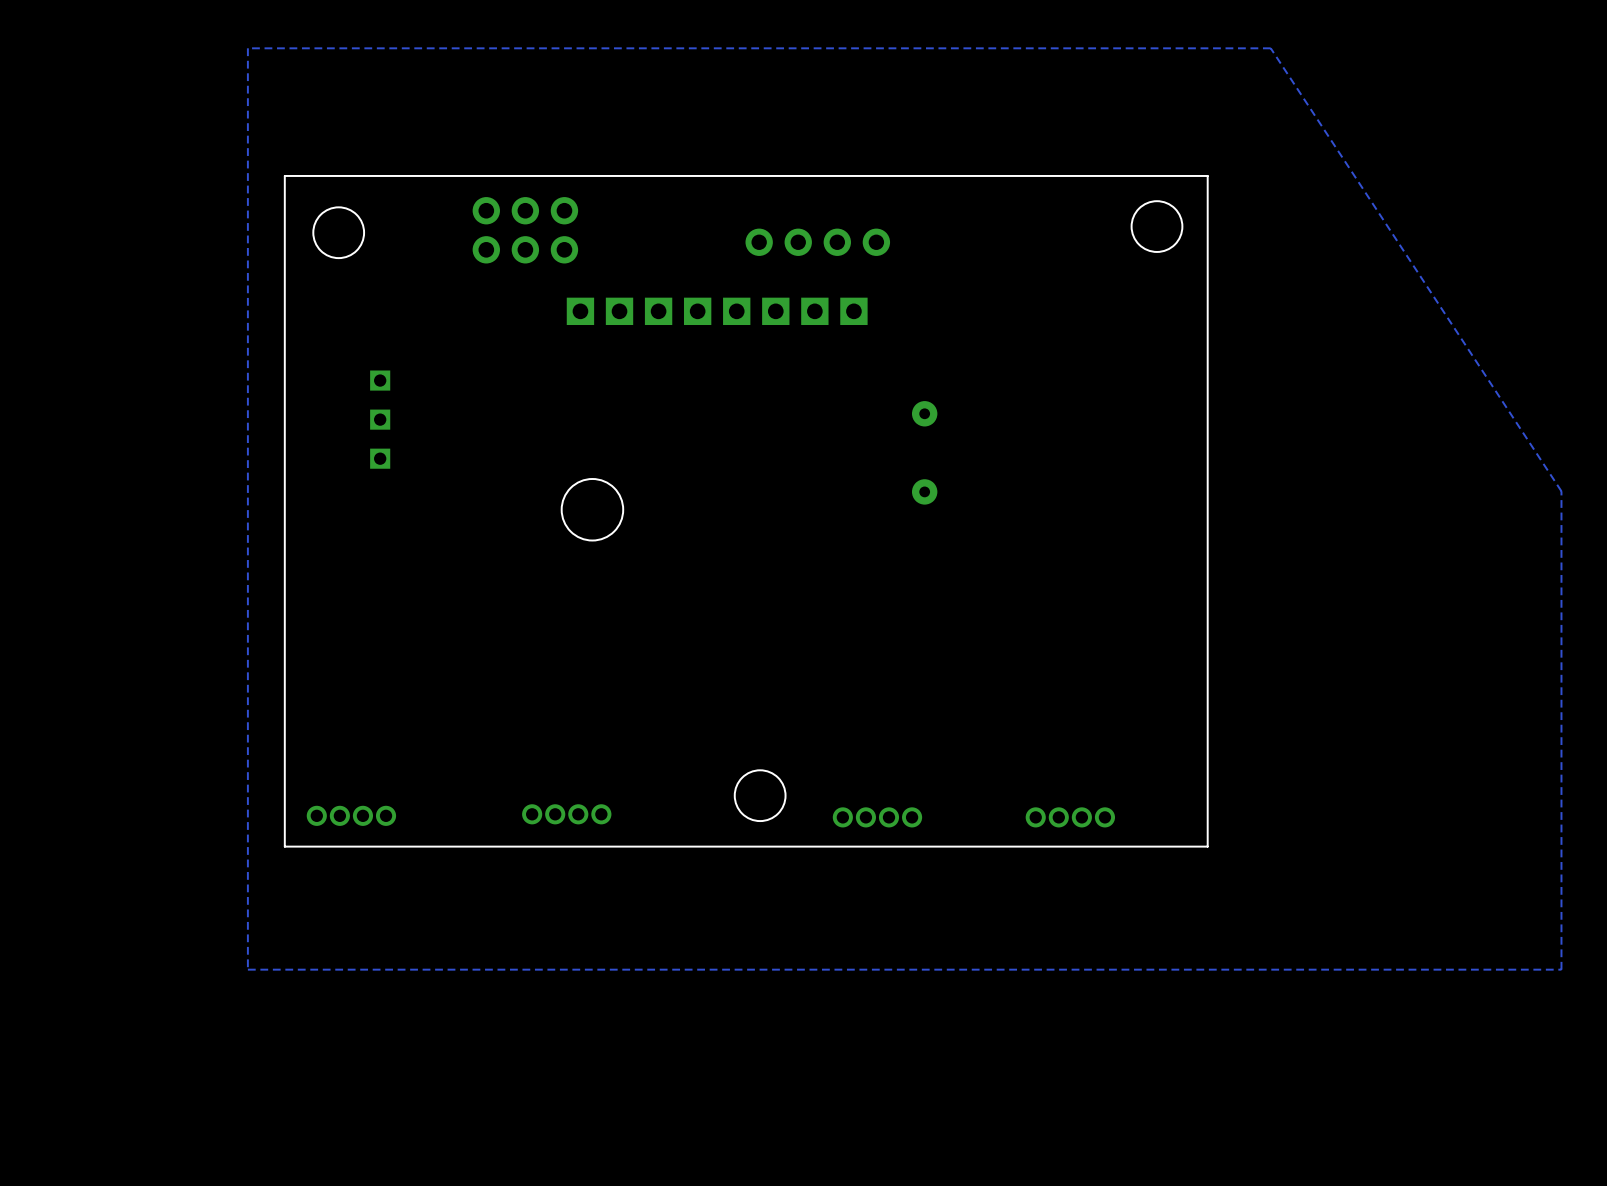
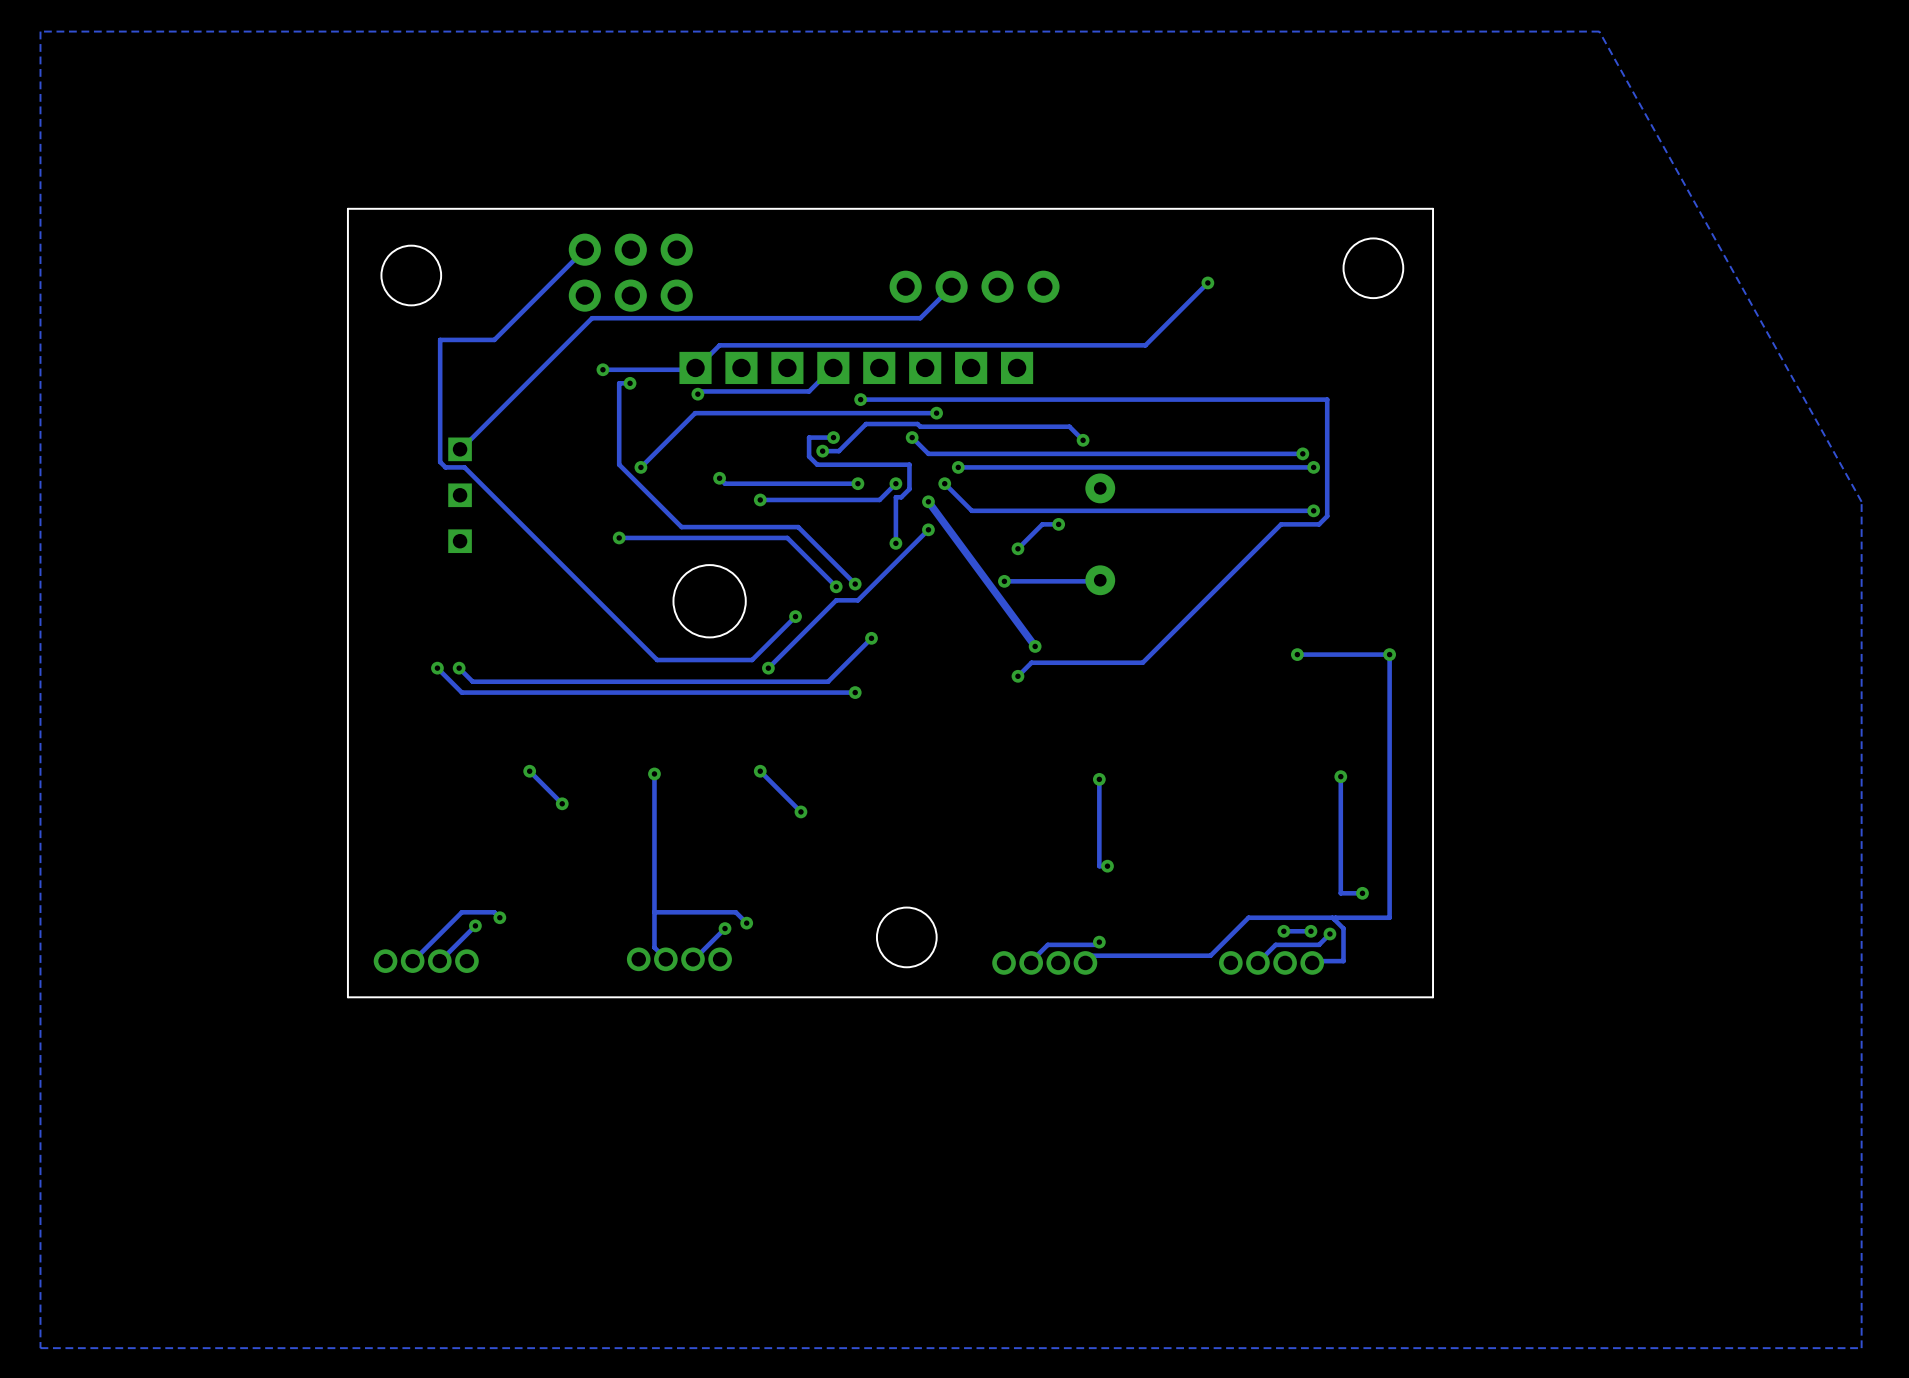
zone outline: (1270, 48) (247, 48) (247, 969) (1561, 969) (1561, 491) (1270, 48) -> (1599, 31) (1861, 501) (1861, 1348) (40, 1348) (40, 31) (1599, 31)
track: none -> (584, 249) (494, 339) (440, 339) (440, 461) (445, 467) (464, 467) (657, 660) (752, 660) (795, 616)
track: none -> (1207, 282) (1145, 345) (719, 345) (695, 369) (602, 369)
via: none -> (1207, 282)
track: none -> (951, 286) (920, 318) (592, 318) (460, 449)
track: none -> (833, 367) (809, 391) (700, 391) (697, 394)
via: none -> (602, 369)
track: none -> (630, 383) (619, 383) (619, 464) (681, 527) (798, 527) (855, 584)
via: none -> (630, 383)
via: none -> (697, 394)
track: none -> (860, 399) (1327, 399) (1327, 516) (1319, 524) (1281, 524) (1142, 662) (1031, 662) (1017, 676)
via: none -> (860, 399)
track: none -> (936, 413) (695, 413) (640, 467)
via: none -> (936, 413)
track: none -> (833, 437) (809, 437) (809, 456) (817, 464) (909, 464) (909, 489) (901, 497) (895, 497) (895, 543)
via: none -> (833, 437)
track: none -> (912, 437) (928, 453) (1302, 453)
via: none -> (912, 437)
track: none -> (1083, 440) (1069, 426) (920, 426) (917, 424) (866, 424) (838, 451) (822, 451)
via: none -> (1083, 440)
via: none -> (822, 451)
via: none -> (1302, 453)
via: none -> (640, 467)
via: none -> (958, 467)
track: none -> (1313, 467) (958, 467)
via: none -> (1313, 467)
track: none -> (719, 478) (725, 483) (857, 483)
via: none -> (719, 478)
via: none -> (857, 483)
track: none -> (895, 483) (879, 499) (760, 499)
via: none -> (895, 483)
track: none -> (944, 483) (971, 510) (1313, 510)
via: none -> (944, 483)
via: none -> (760, 499)
track: none -> (928, 501) (1035, 646)
via: none -> (928, 501)
via: none -> (1313, 510)
track: none -> (1058, 524) (1042, 524) (1017, 548)
via: none -> (1058, 524)
track: none -> (928, 529) (857, 600) (836, 600) (768, 668)
via: none -> (928, 529)
track: none -> (619, 537) (787, 537) (836, 586)
via: none -> (619, 537)
via: none -> (895, 543)
via: none -> (1017, 548)
track: none -> (1100, 580) (1004, 581)
via: none -> (1004, 581)
via: none -> (855, 584)
via: none -> (836, 586)
via: none -> (795, 616)
track: none -> (871, 638) (828, 681) (472, 681) (459, 668)
via: none -> (871, 638)
via: none -> (1035, 646)
track: none -> (1297, 654) (1389, 654) (1389, 917) (1334, 919)
via: none -> (1297, 654)
via: none -> (1389, 654)
track: none -> (437, 668) (461, 692) (855, 692)
via: none -> (437, 668)
via: none -> (459, 668)
via: none -> (768, 668)
via: none -> (1017, 676)
via: none -> (855, 692)
track: none -> (529, 771) (562, 803)
via: none -> (529, 771)
track: none -> (760, 771) (800, 811)
via: none -> (760, 771)
track: none -> (654, 773) (654, 947) (665, 959)
via: none -> (654, 773)
track: none -> (1340, 776) (1340, 893) (1362, 893)
via: none -> (1340, 776)
track: none -> (1099, 779) (1099, 866) (1107, 866)
via: none -> (1099, 779)
via: none -> (562, 803)
via: none -> (800, 811)
via: none -> (1107, 866)
via: none -> (1362, 893)
track: none -> (654, 912) (735, 912) (746, 923)
track: none -> (499, 917) (494, 912) (461, 912) (413, 961)
via: none -> (499, 917)
via: none -> (746, 923)
track: none -> (475, 925) (440, 961)
via: none -> (475, 925)
track: none -> (725, 928) (692, 959)
via: none -> (725, 928)
via: none -> (1283, 931)
track: none -> (1310, 931) (1283, 931)
via: none -> (1310, 931)
track: none -> (1329, 934) (1319, 944) (1275, 944) (1257, 962)
via: none -> (1329, 934)
track: none -> (1099, 942) (1096, 944) (1047, 944) (1031, 962)
via: none -> (1099, 942)
track: none -> (1312, 962) (1313, 961) (1343, 961) (1343, 928) (1332, 917) (1248, 917) (1210, 955) (1091, 955) (1085, 962)

